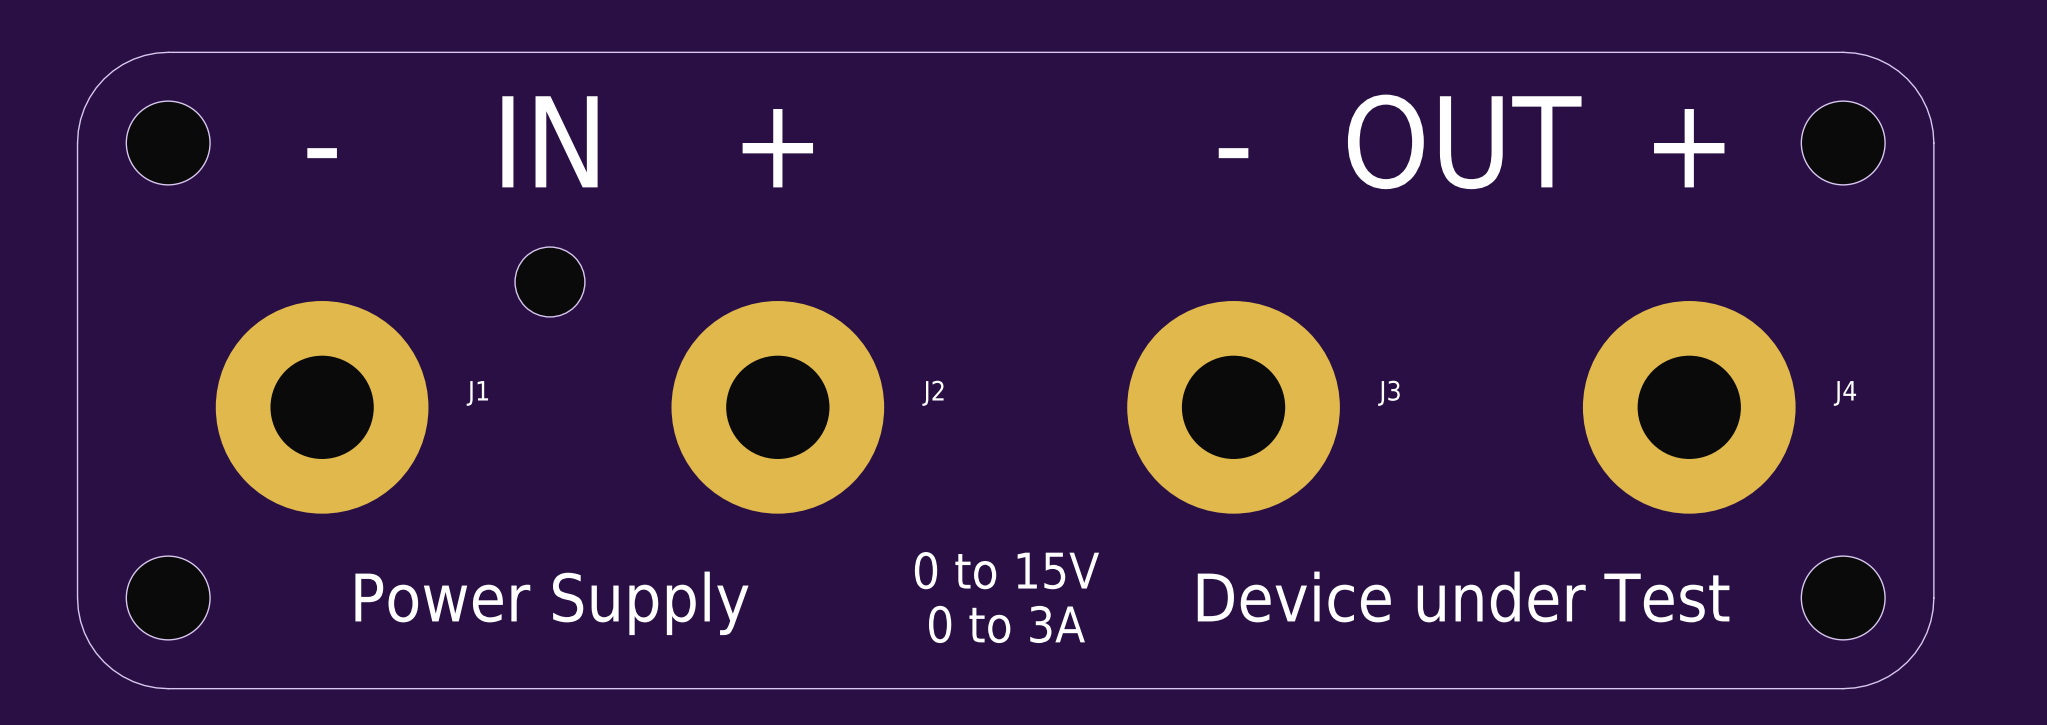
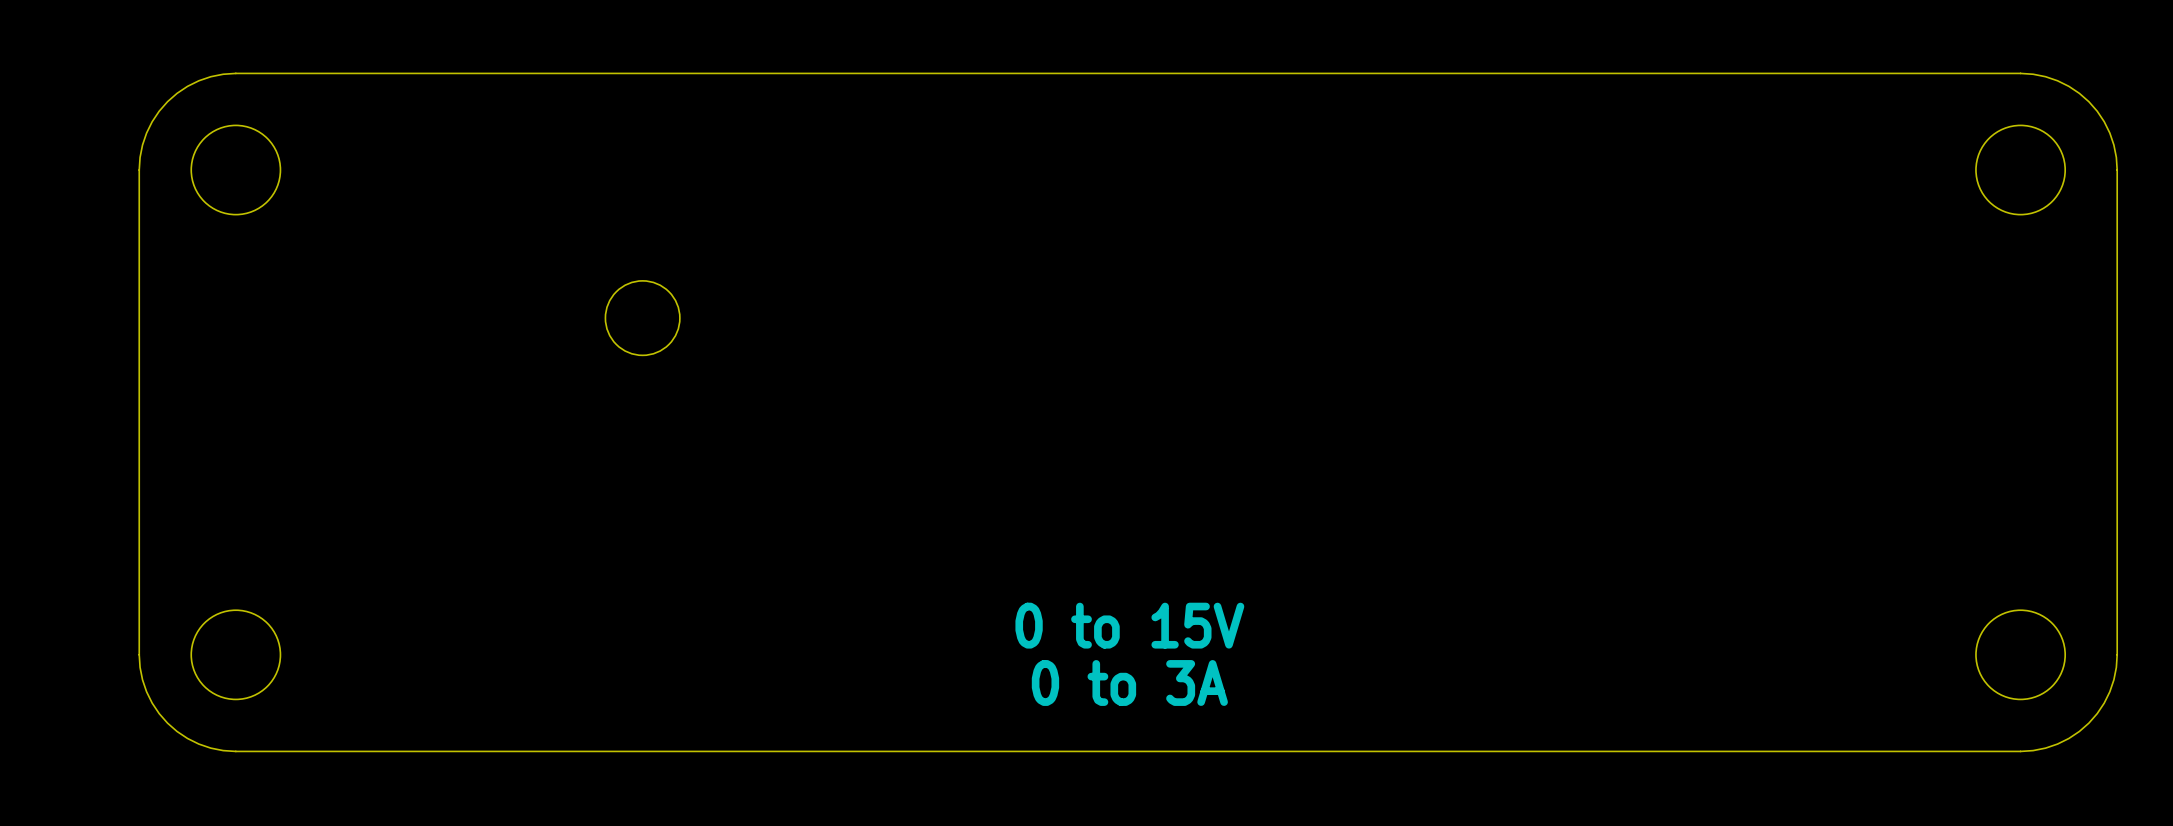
text: IN (549, 141) -> none
text: OUT (1464, 141) -> none
text: + (777, 148) -> none
text: + (1689, 148) -> none
text: - (322, 153) -> none
text: - (1233, 153) -> none
J1: (322, 407) -> none
J2: (777, 407) -> none
J3: (1233, 407) -> none
J4: (1689, 407) -> none
text: Device under Test (1463, 596) -> none
text: Power Supply (552, 603) -> none

